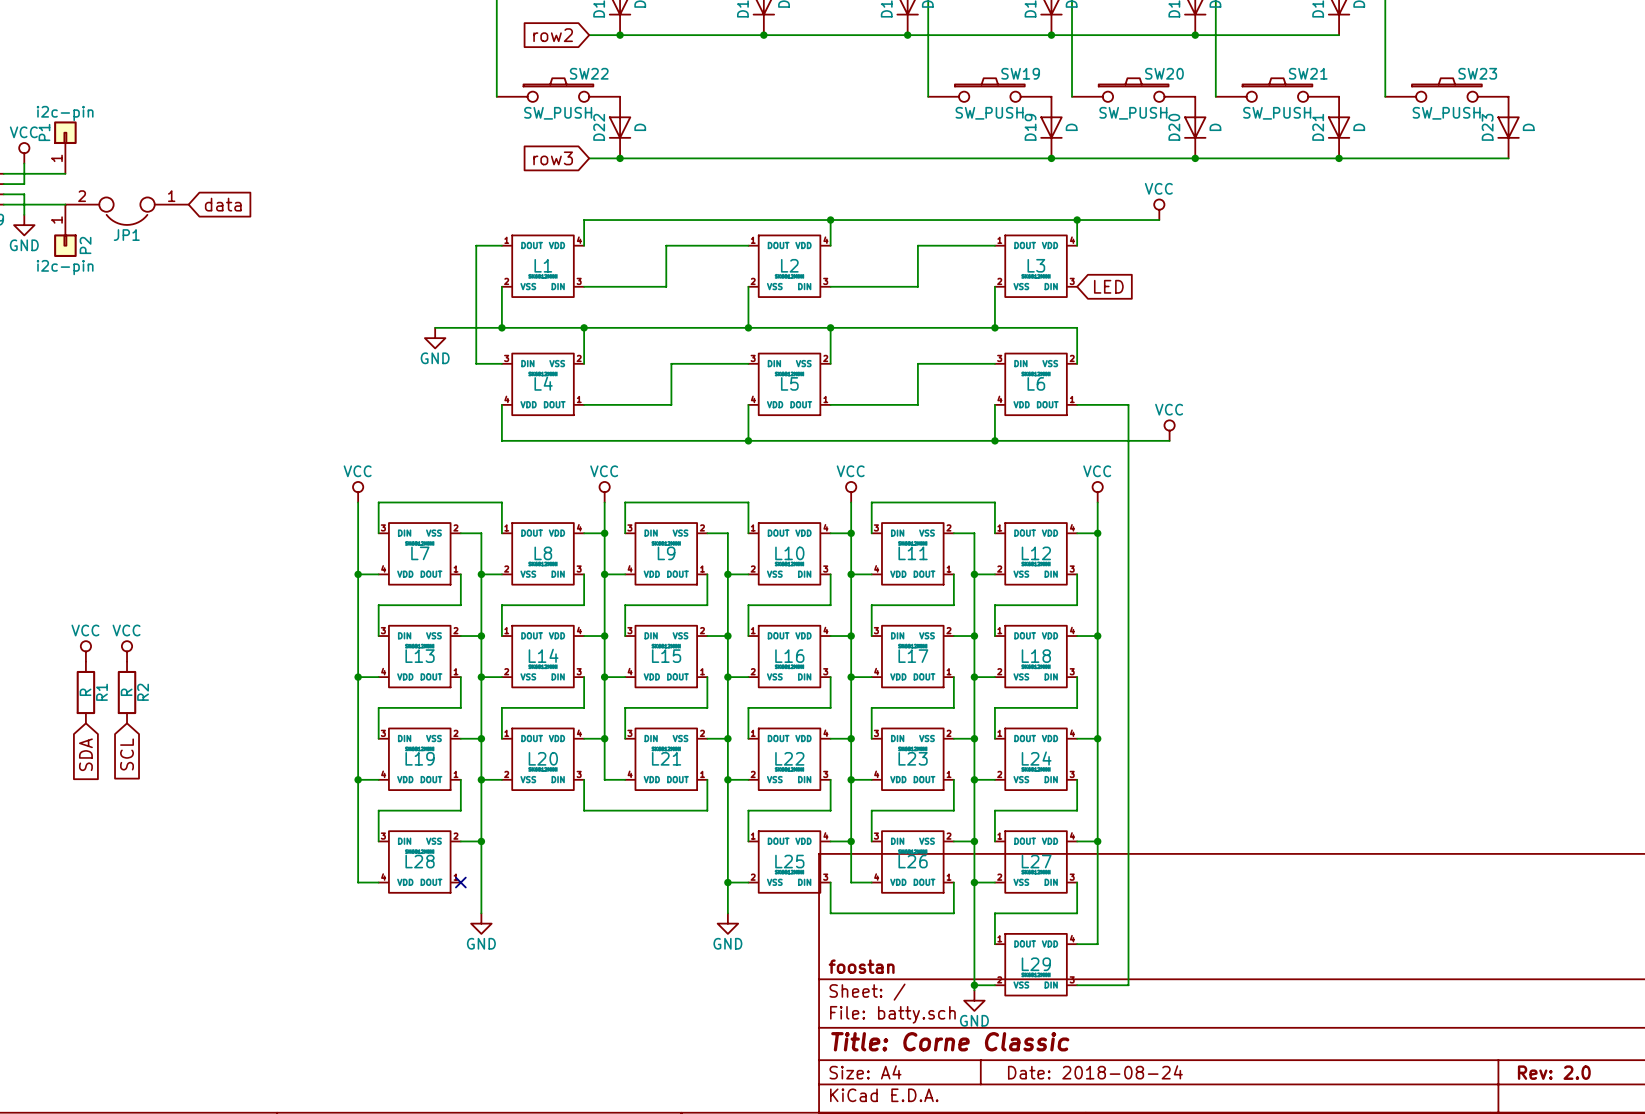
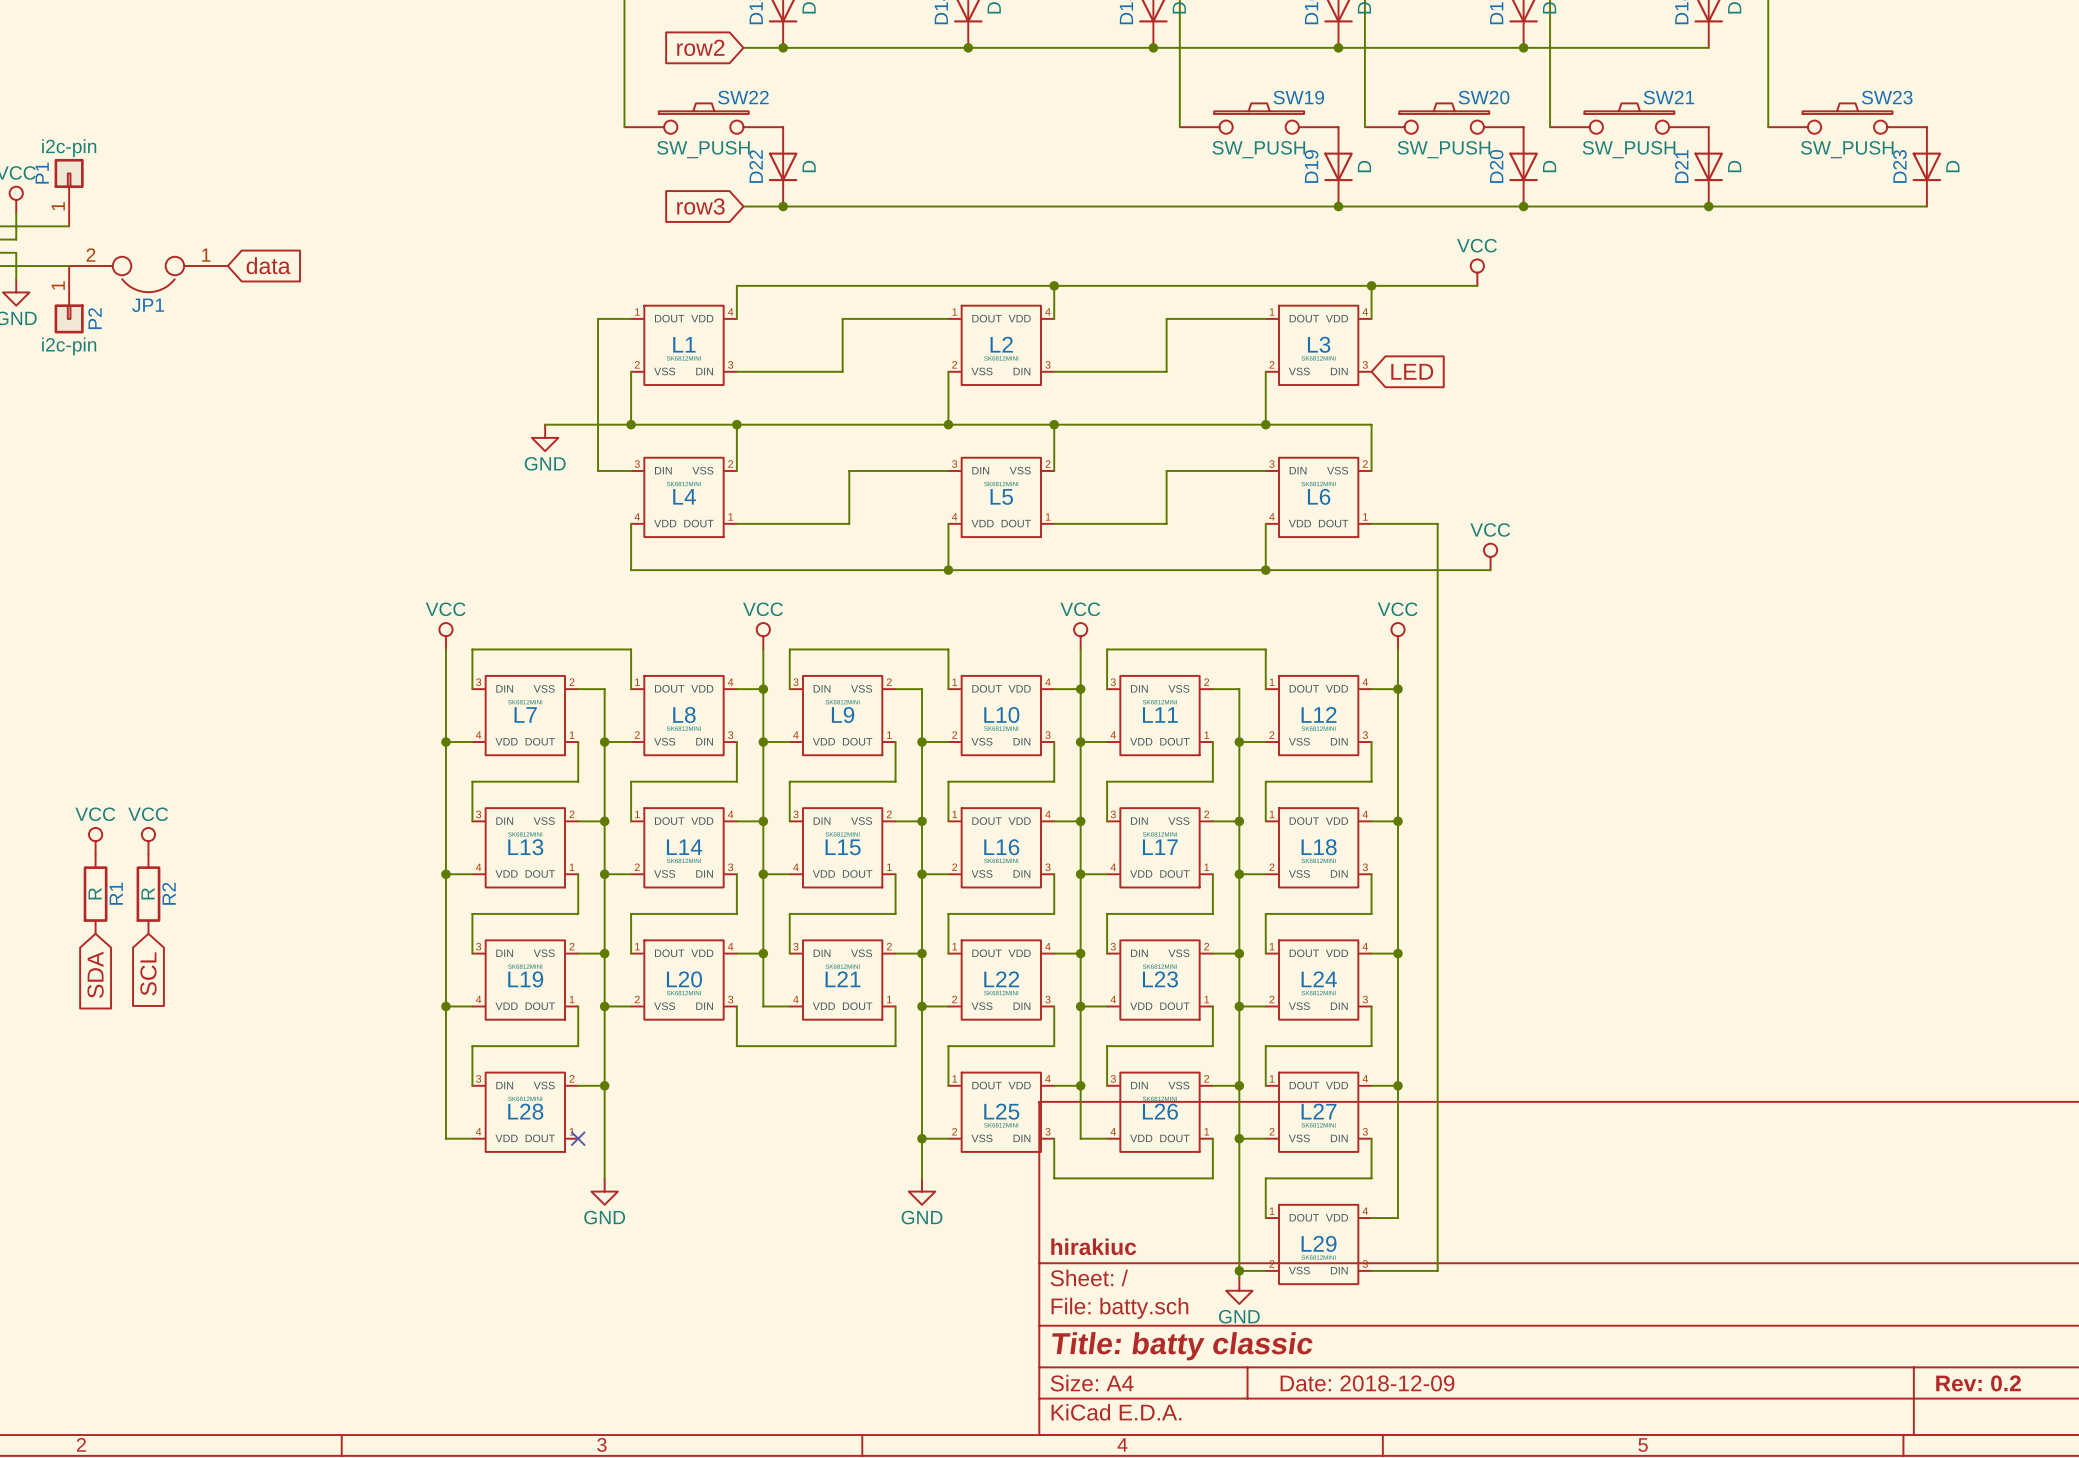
title block: foostan (861, 966) -> hirakiuc (1093, 1246)
title block: Title: Corne Classic (950, 1041) -> Title: batty classic (1182, 1346)
title block: Date: 2018-08-24 (1095, 1072) -> Date: 2018-12-09 (1367, 1383)
title block: Rev: 2.0 (1554, 1072) -> Rev: 0.2 (1978, 1383)

